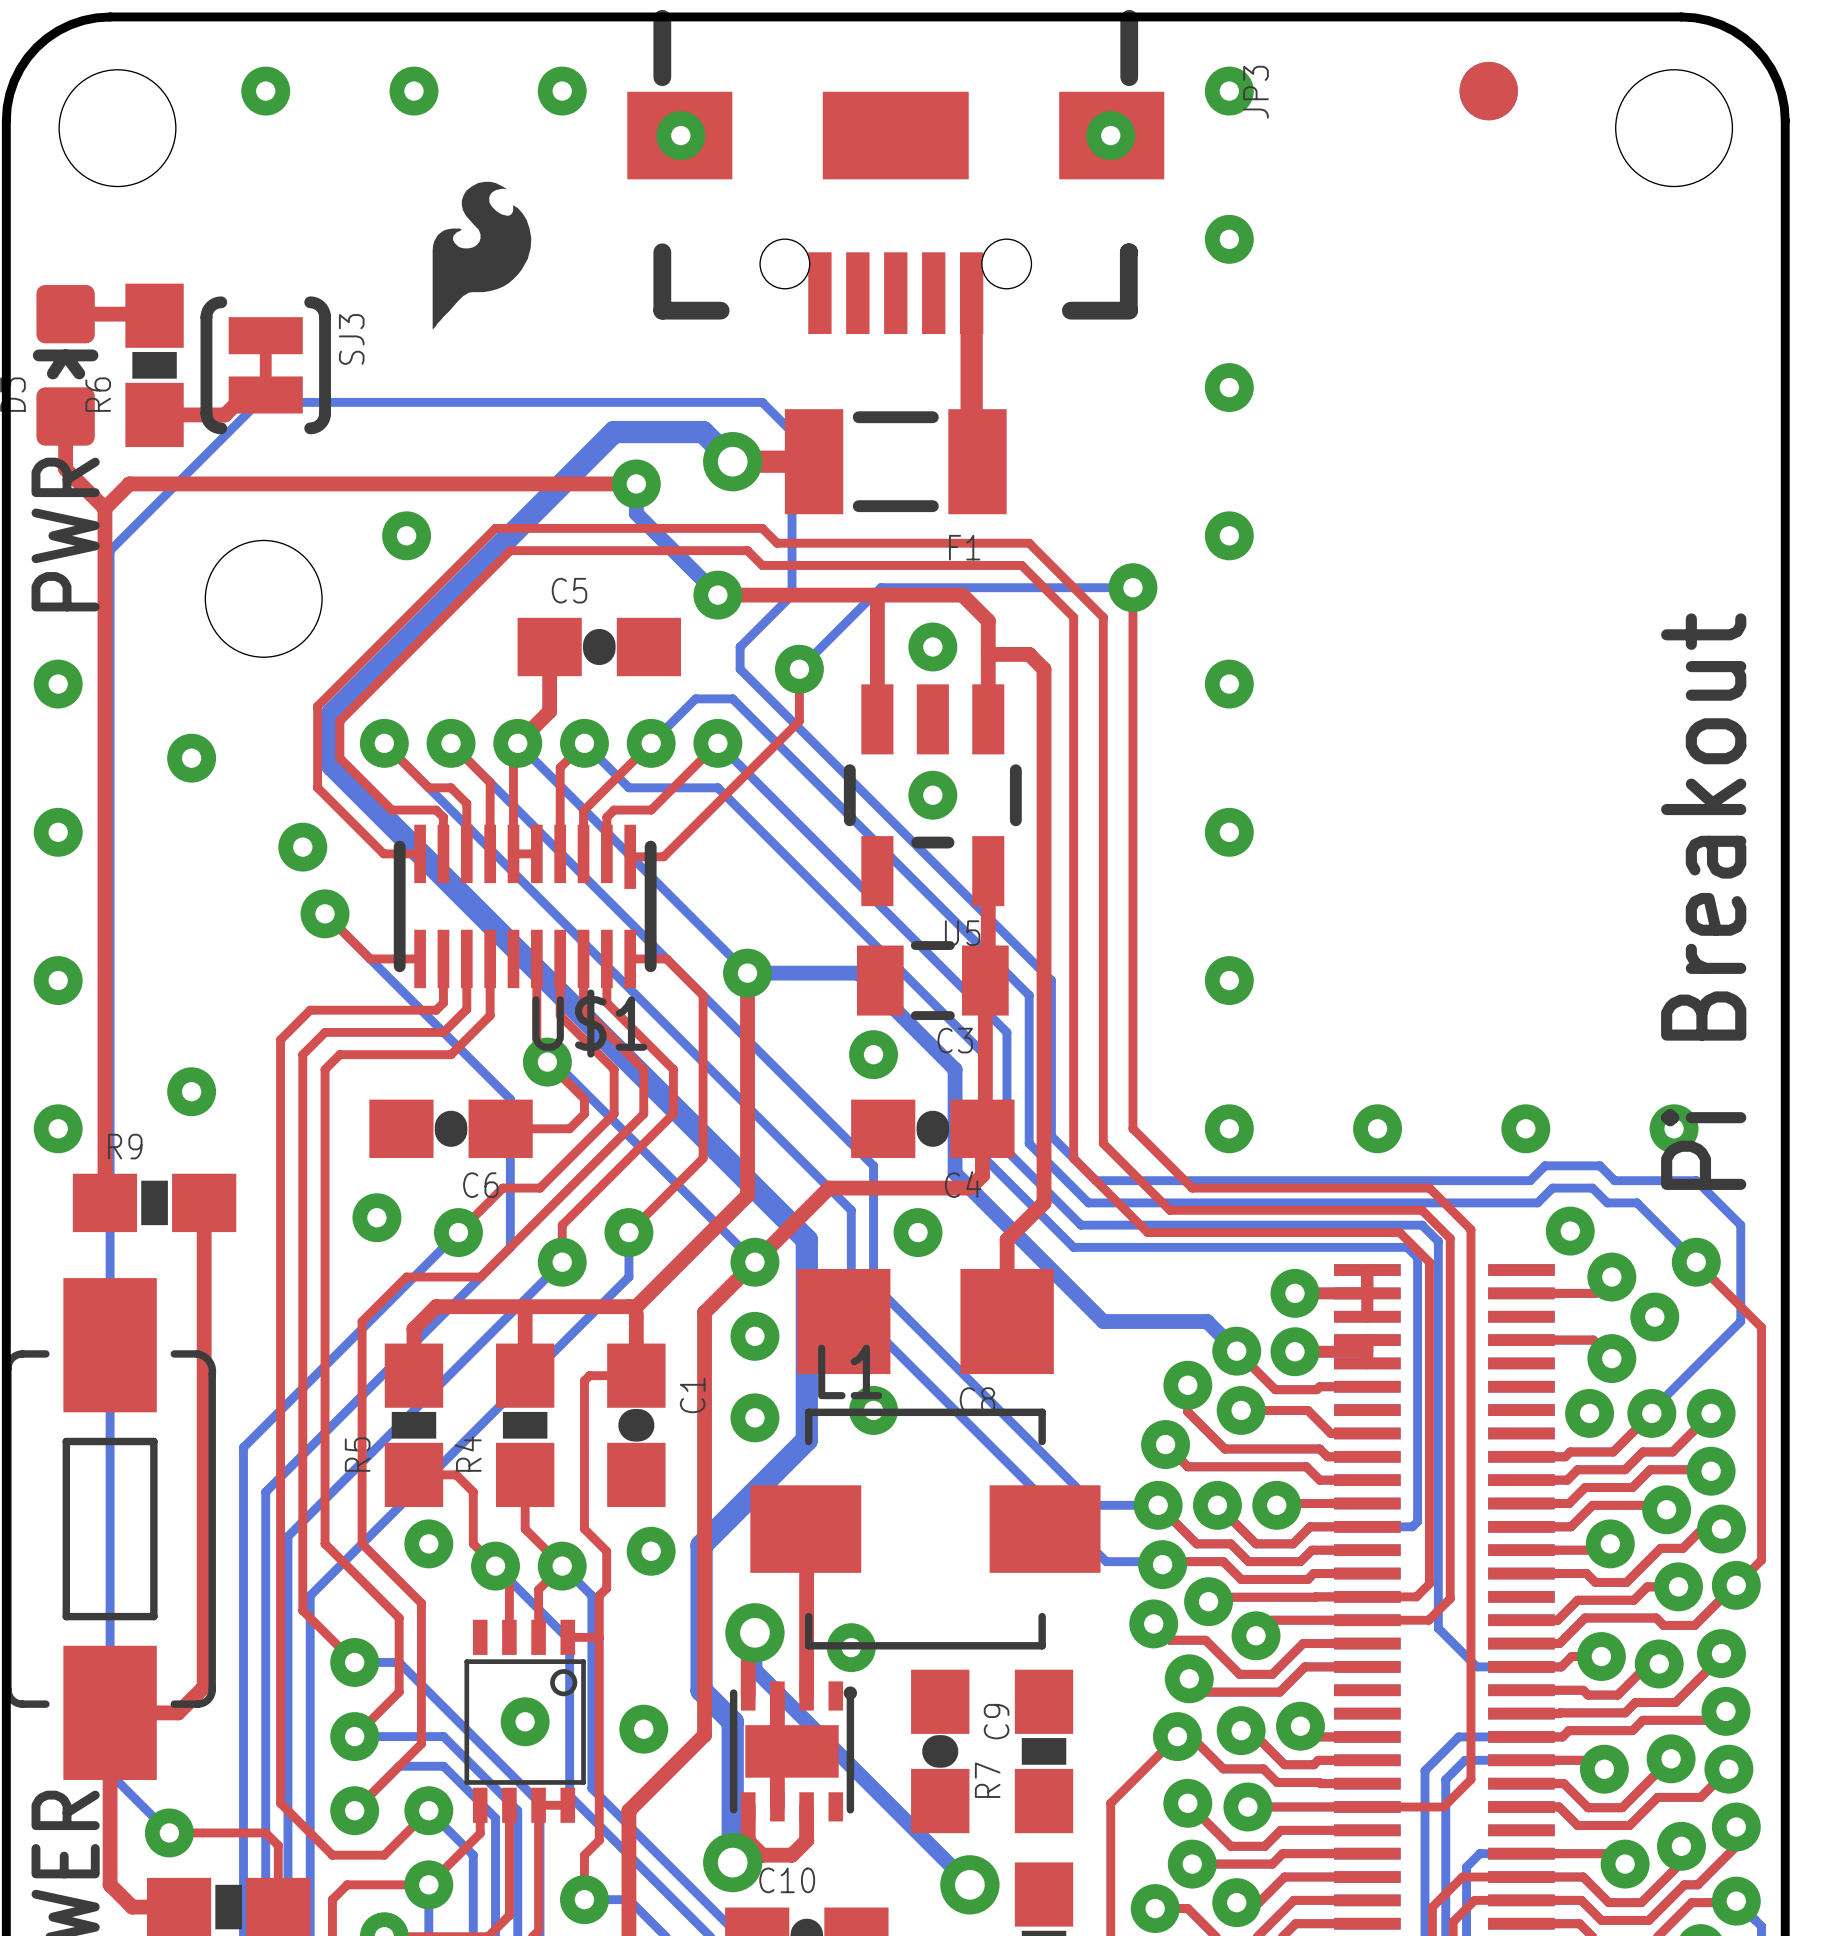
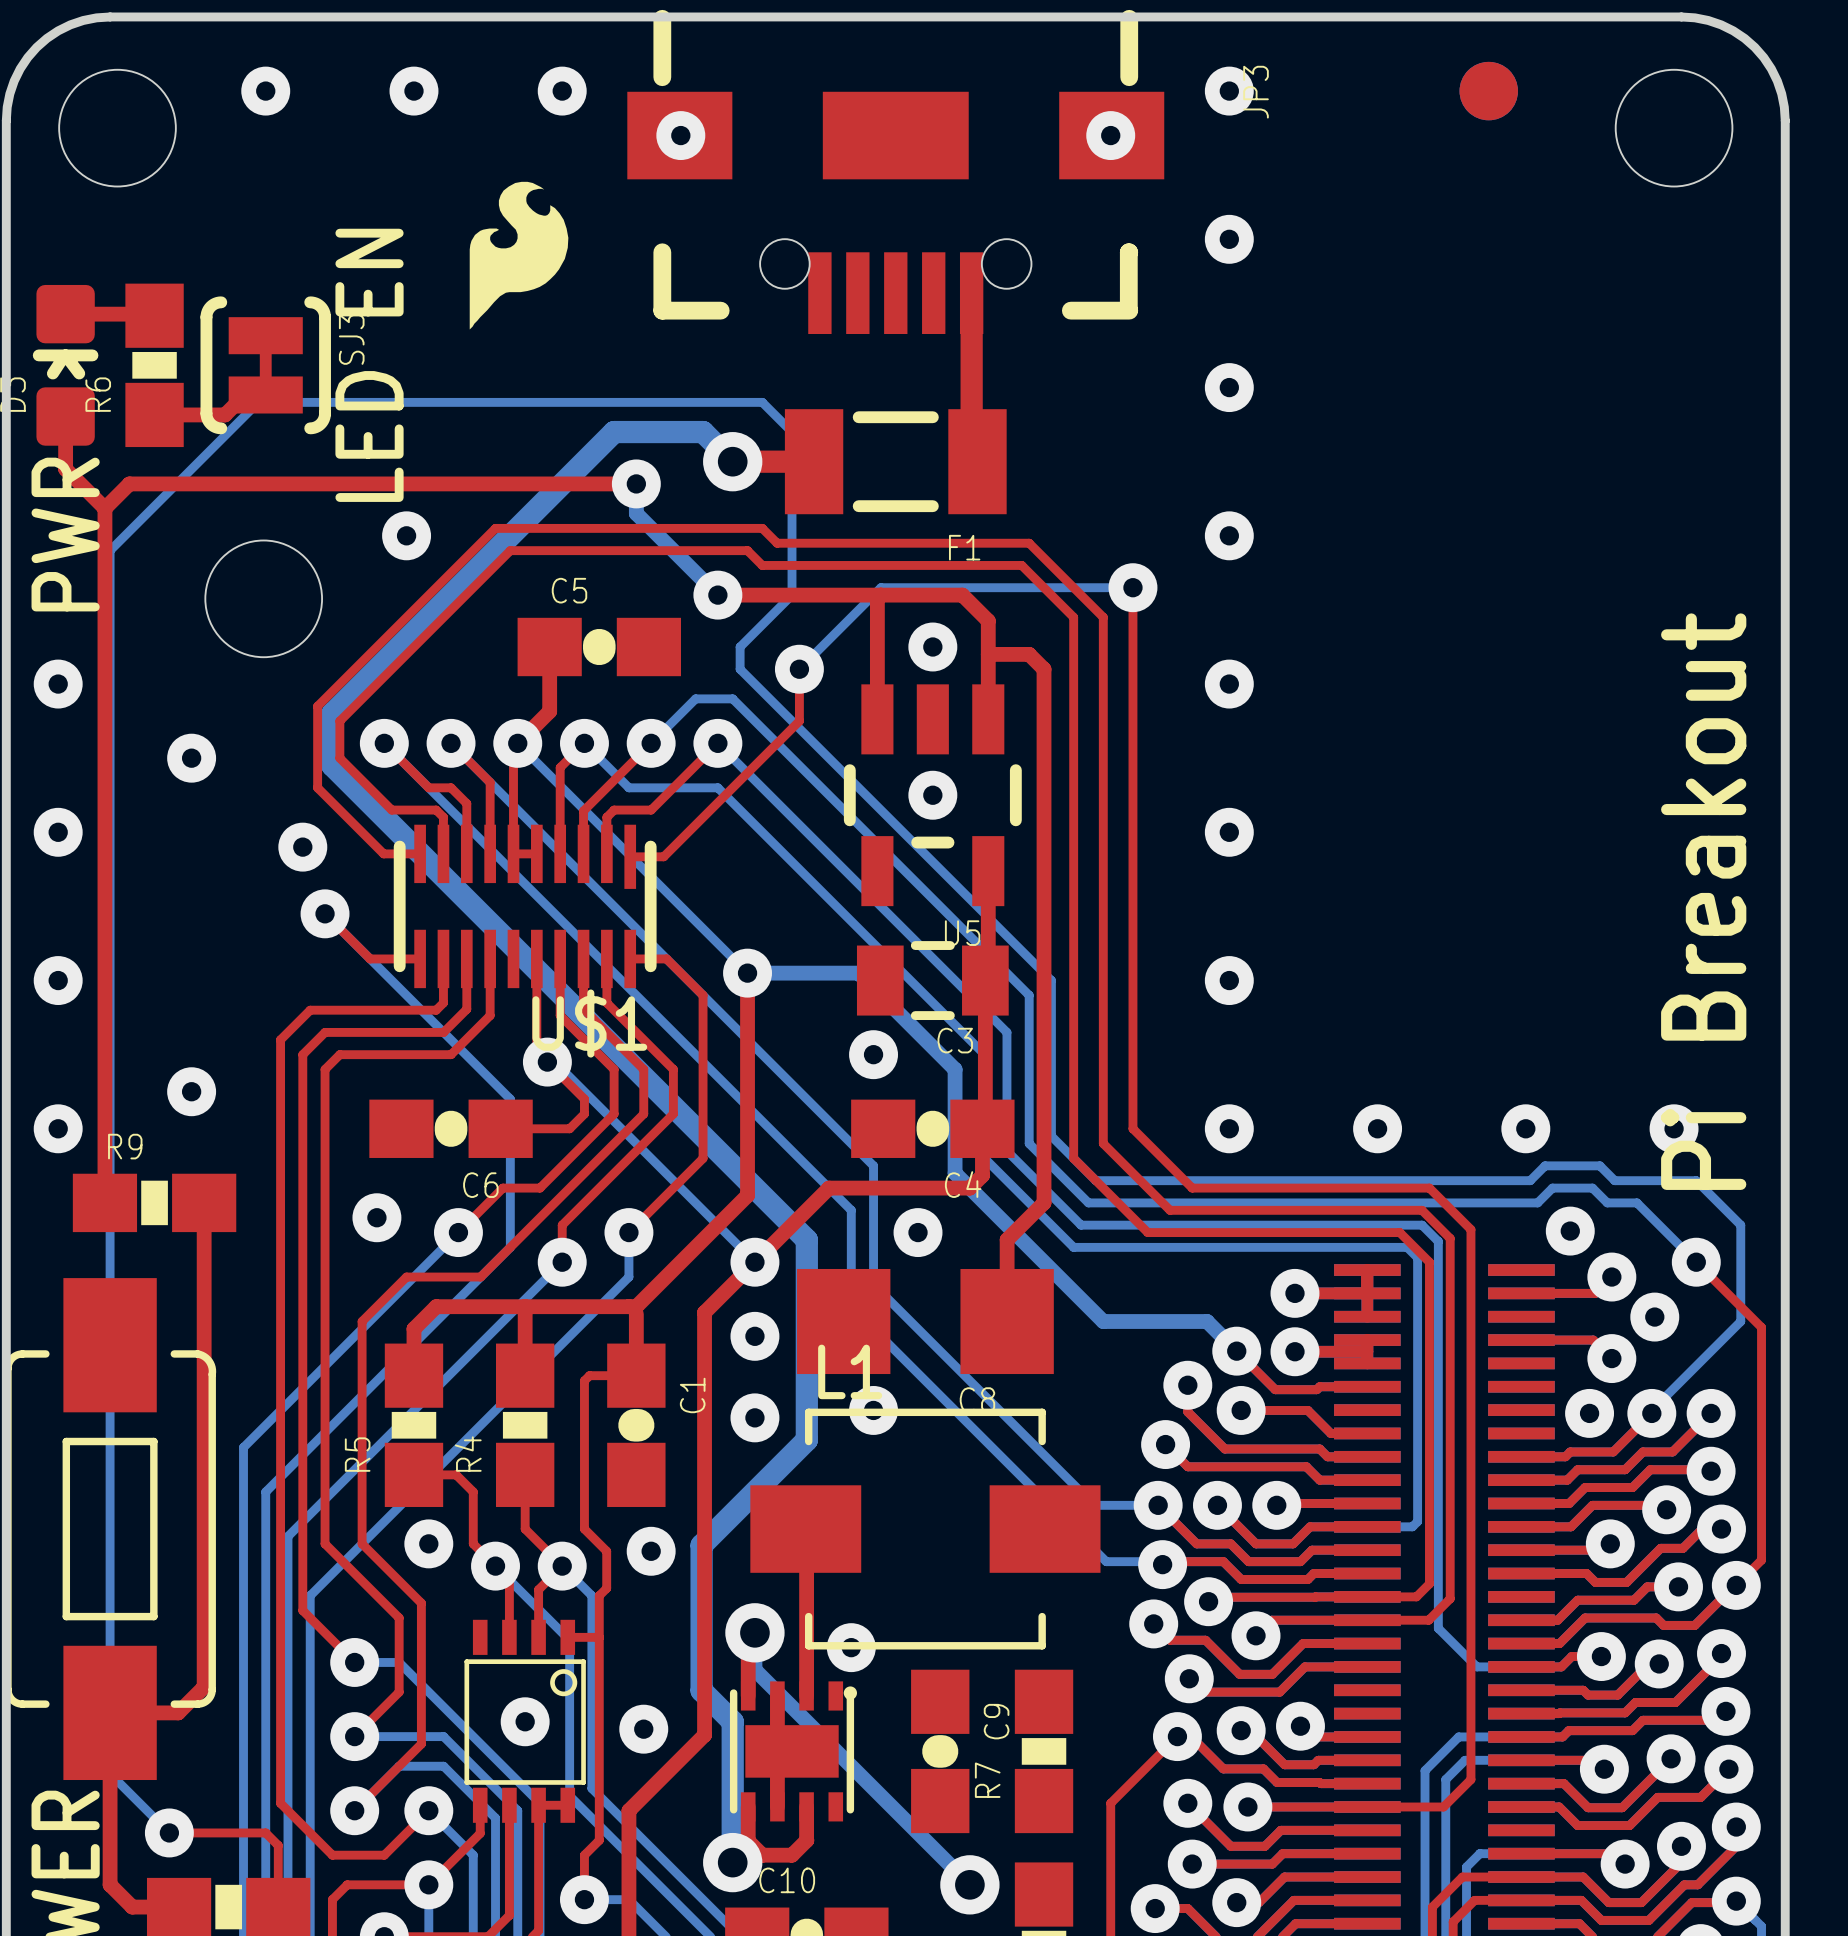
drawing position: (481, 255) -> (519, 255)
text: none -> LED EN (369, 365)

